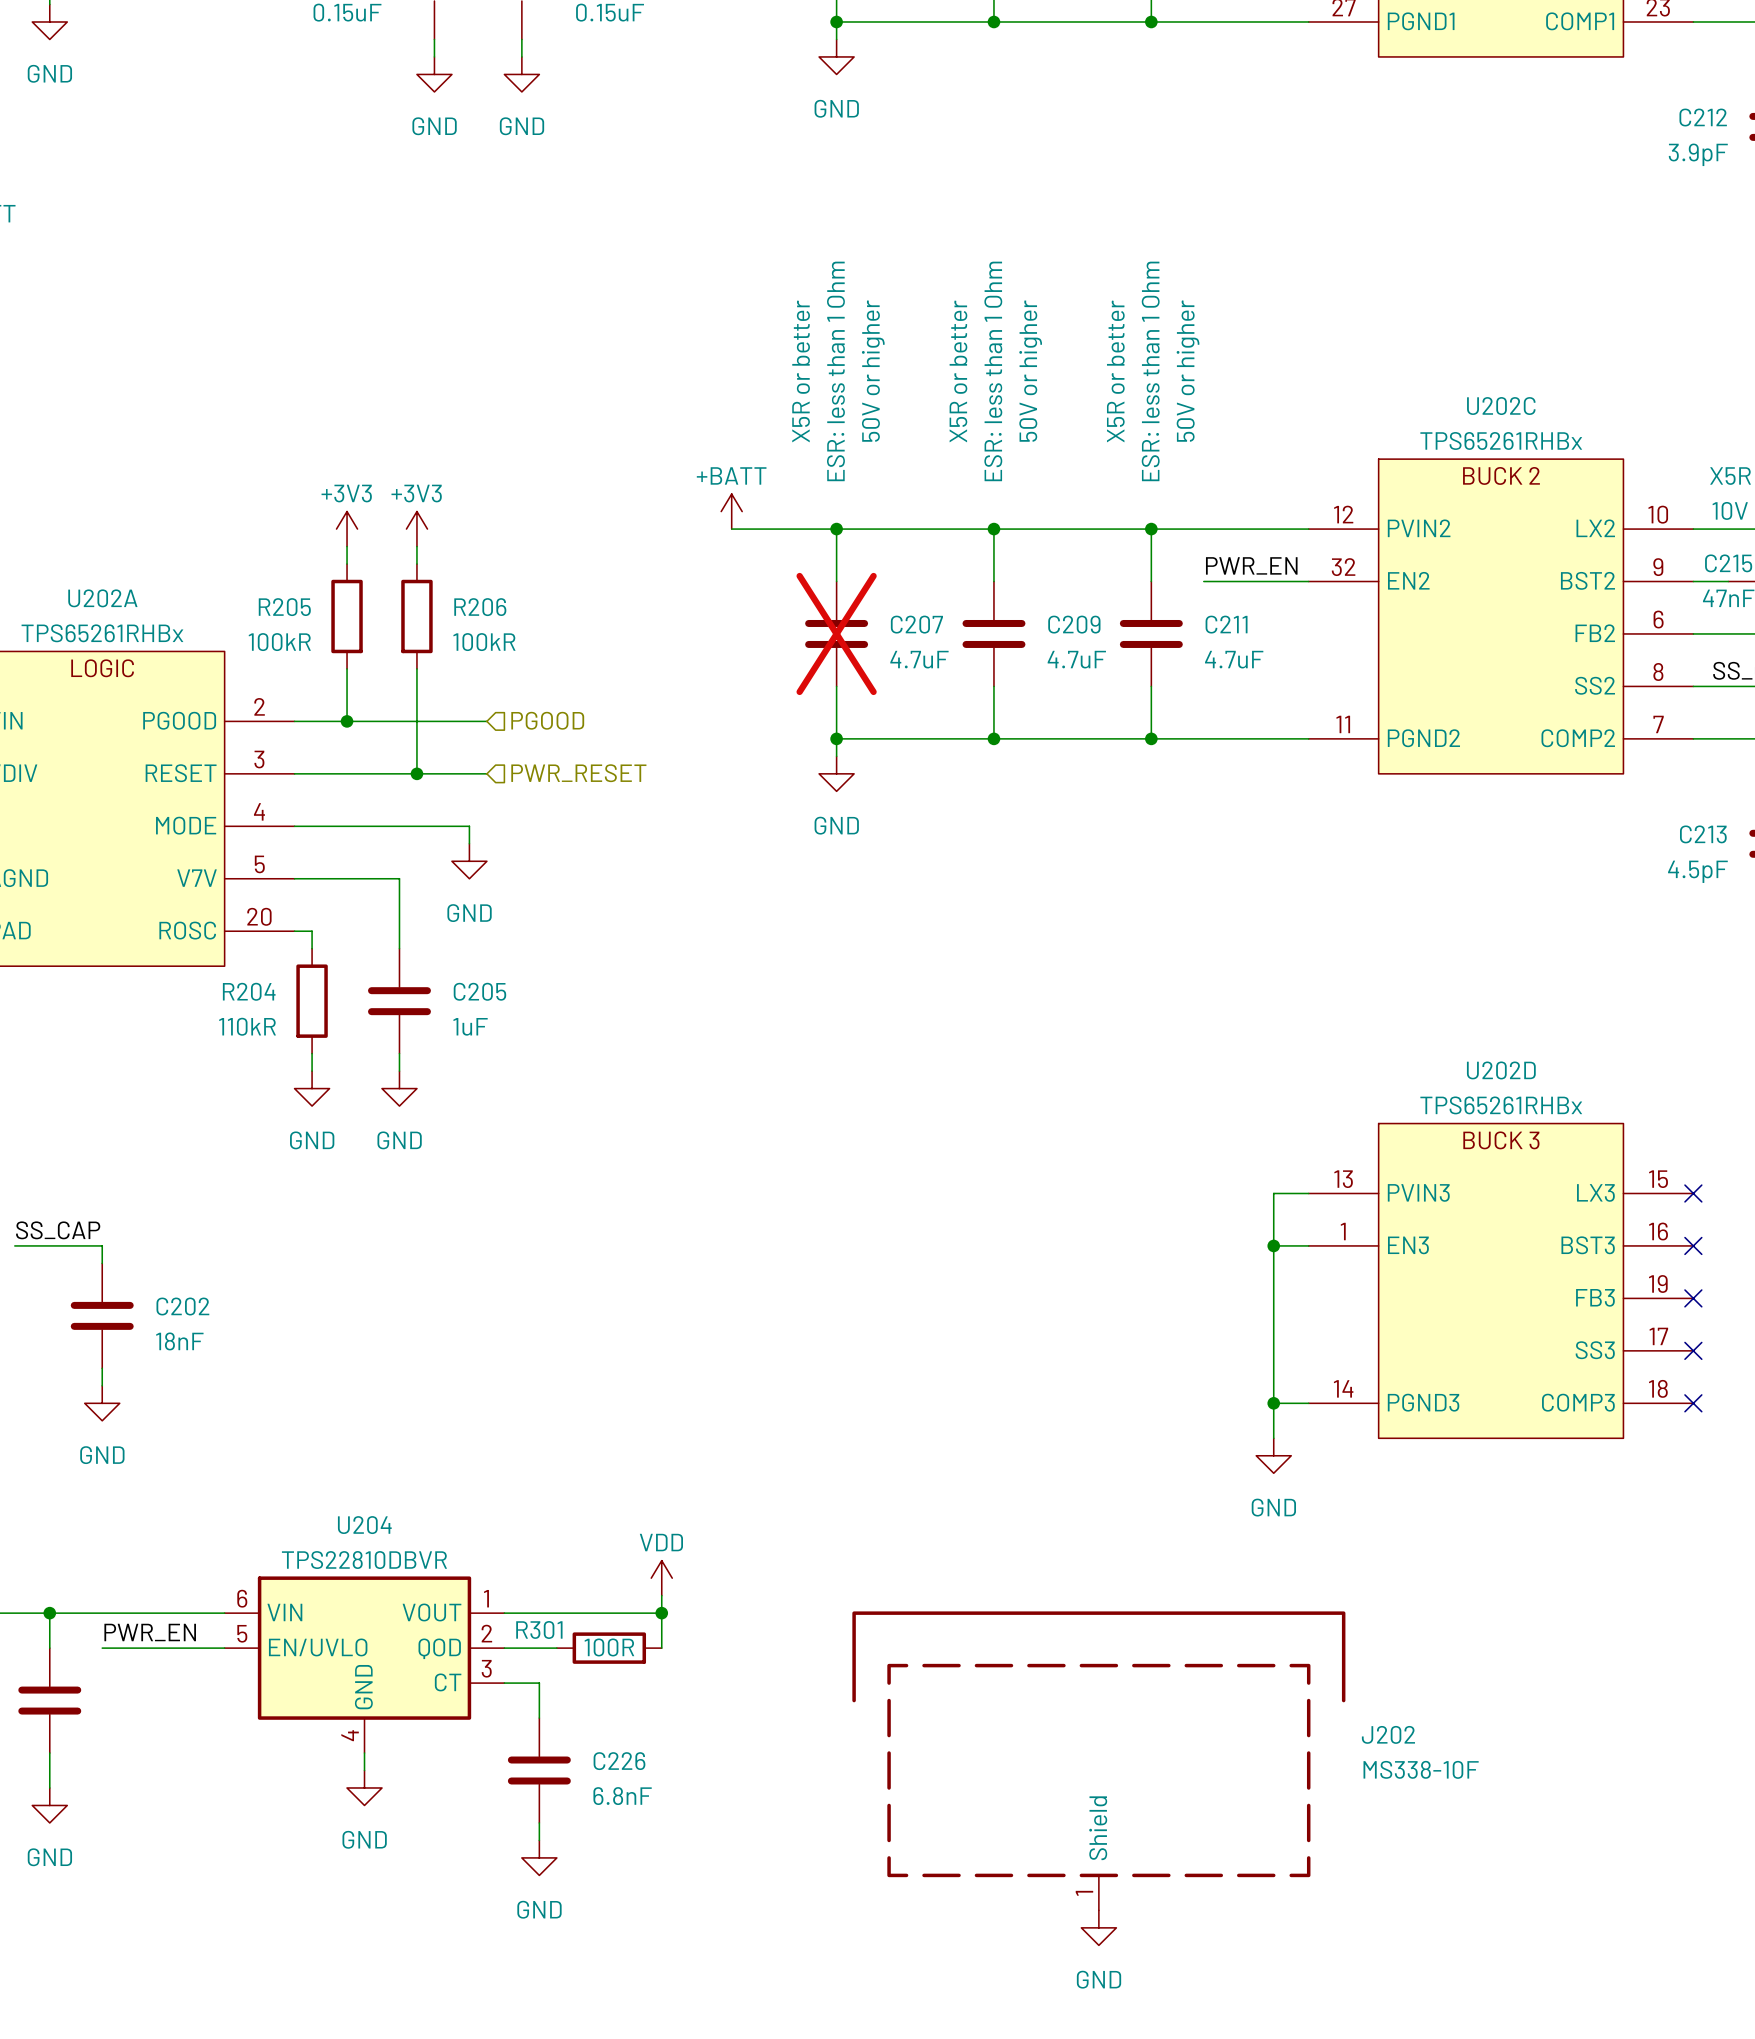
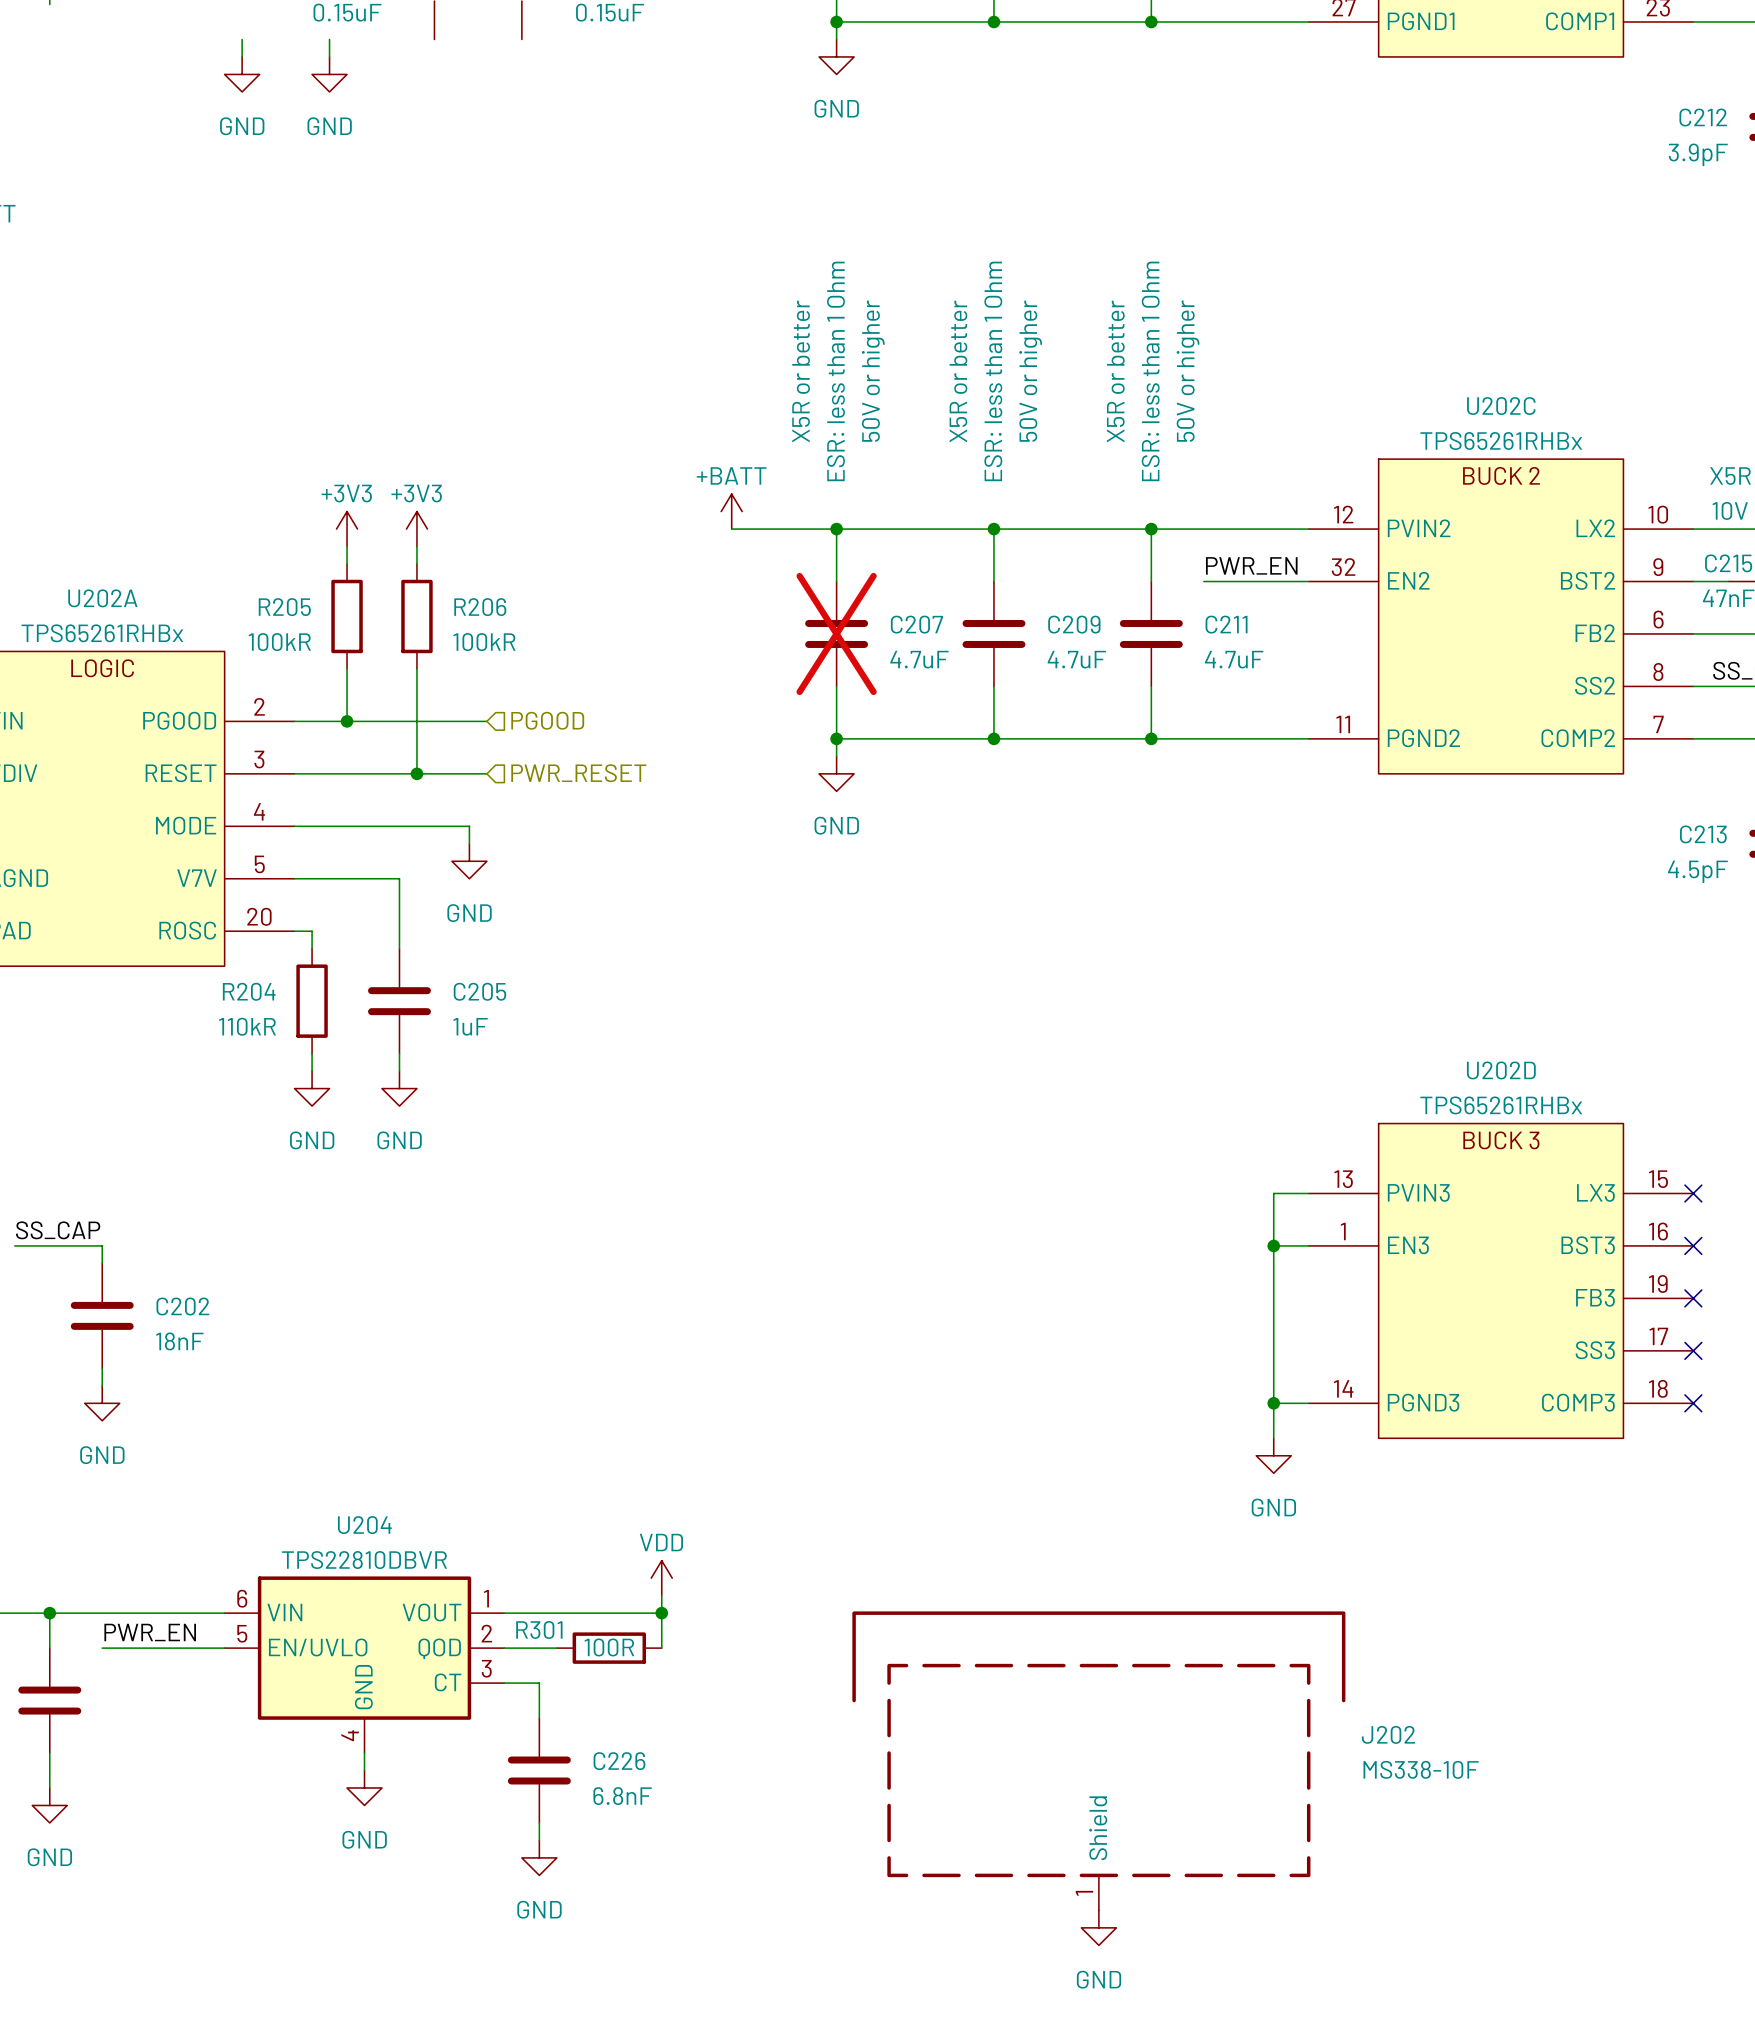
power symbol: GND (49, 21) -> none
wire: (434, 39) (434, 56) -> (242, 39) (242, 56)
wire: (521, 39) (521, 56) -> (329, 39) (329, 56)
power symbol: none -> GND (242, 74)
power symbol: none -> GND (329, 74)
power symbol: GND (434, 74) -> none
power symbol: GND (521, 74) -> none

